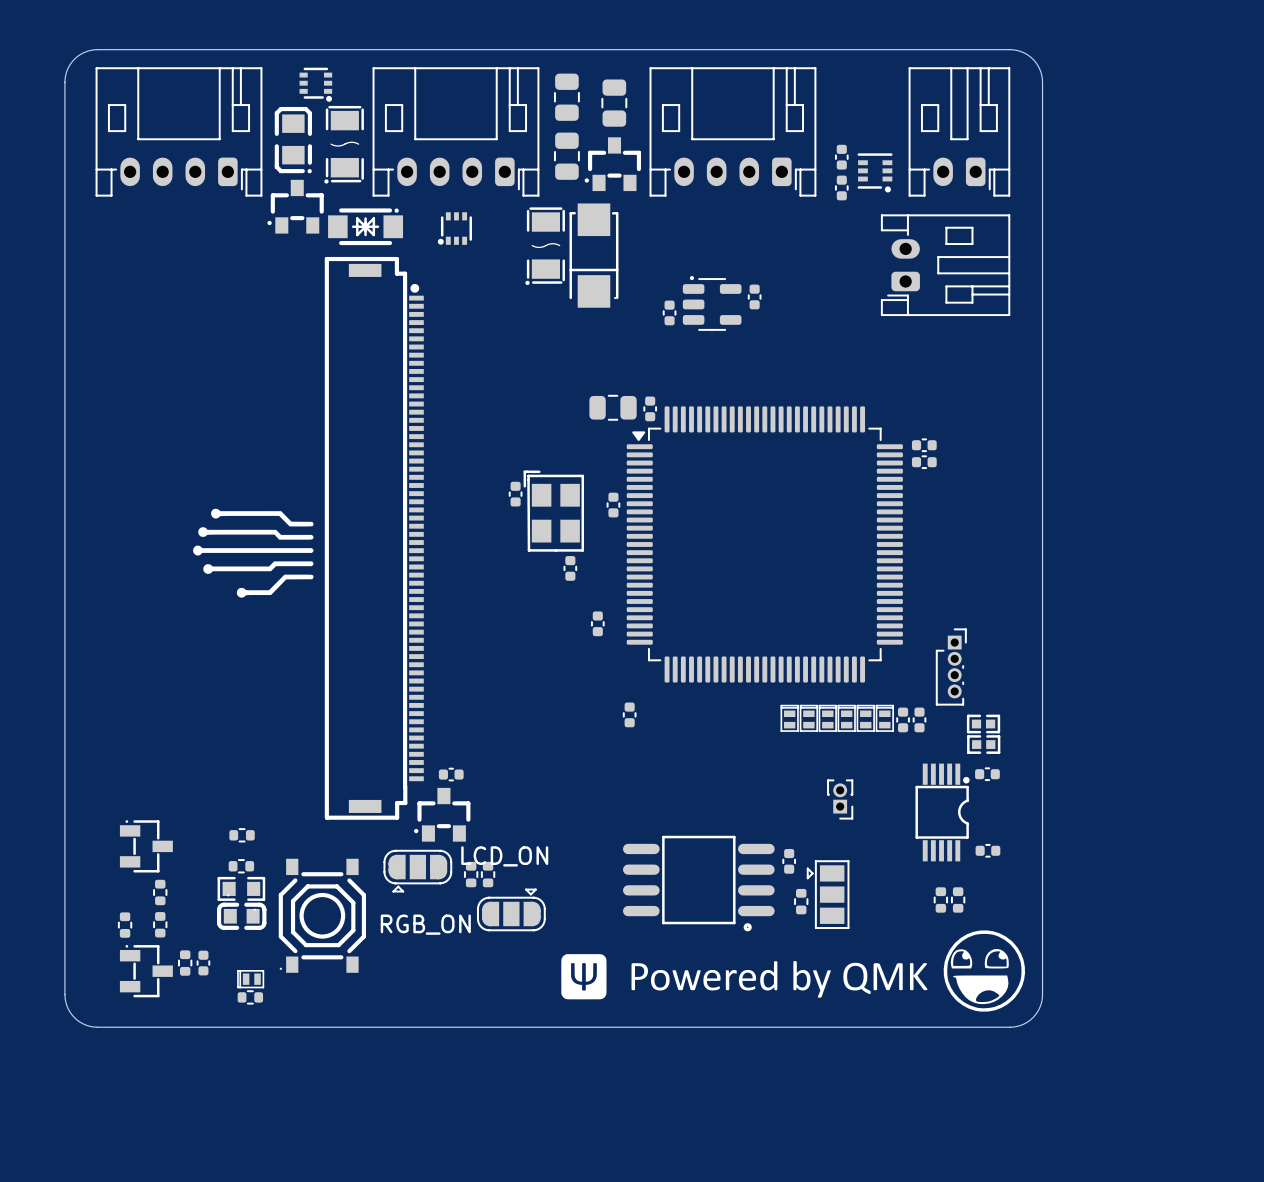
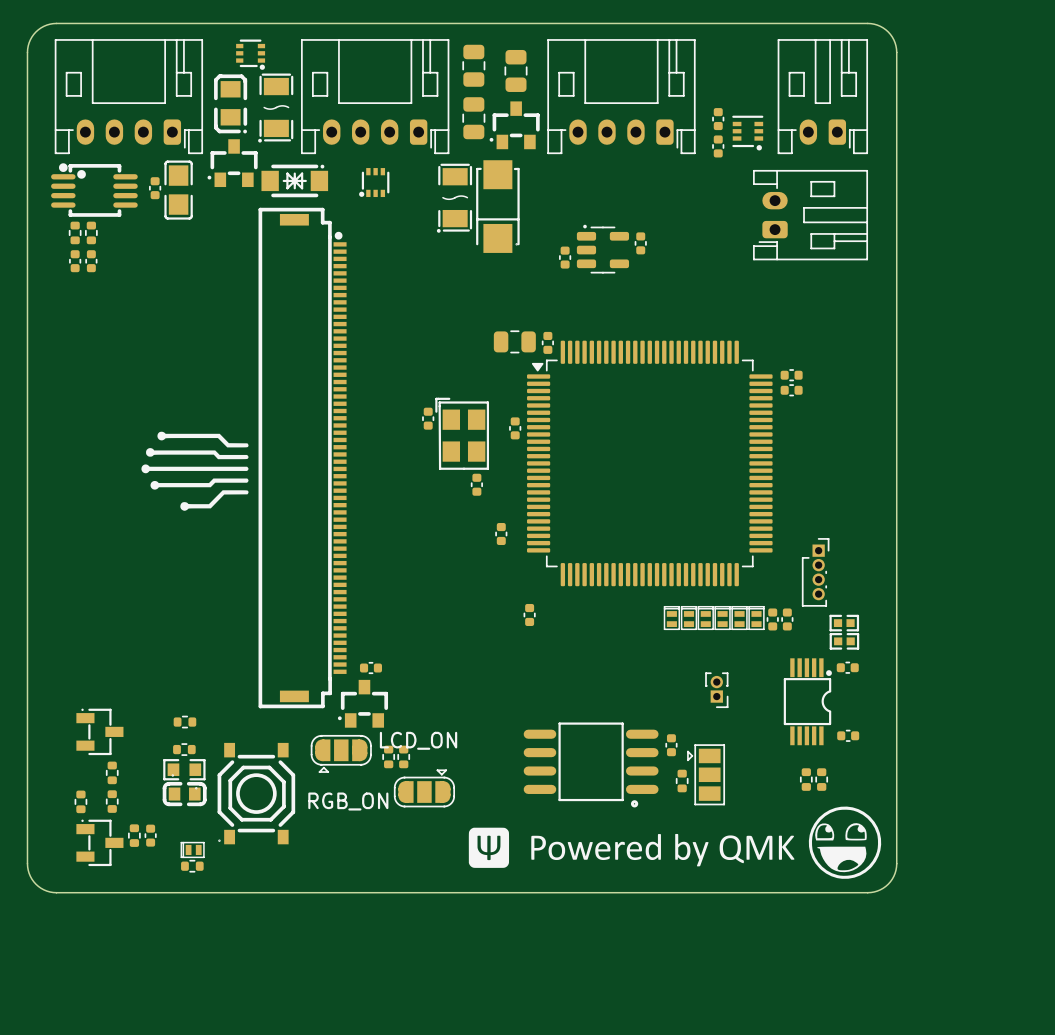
part: none -> (155, 188)
part: none -> (94, 190)
part: none -> (178, 190)
part: none -> (75, 232)
part: none -> (91, 232)
part: none -> (75, 261)
part: none -> (91, 261)

